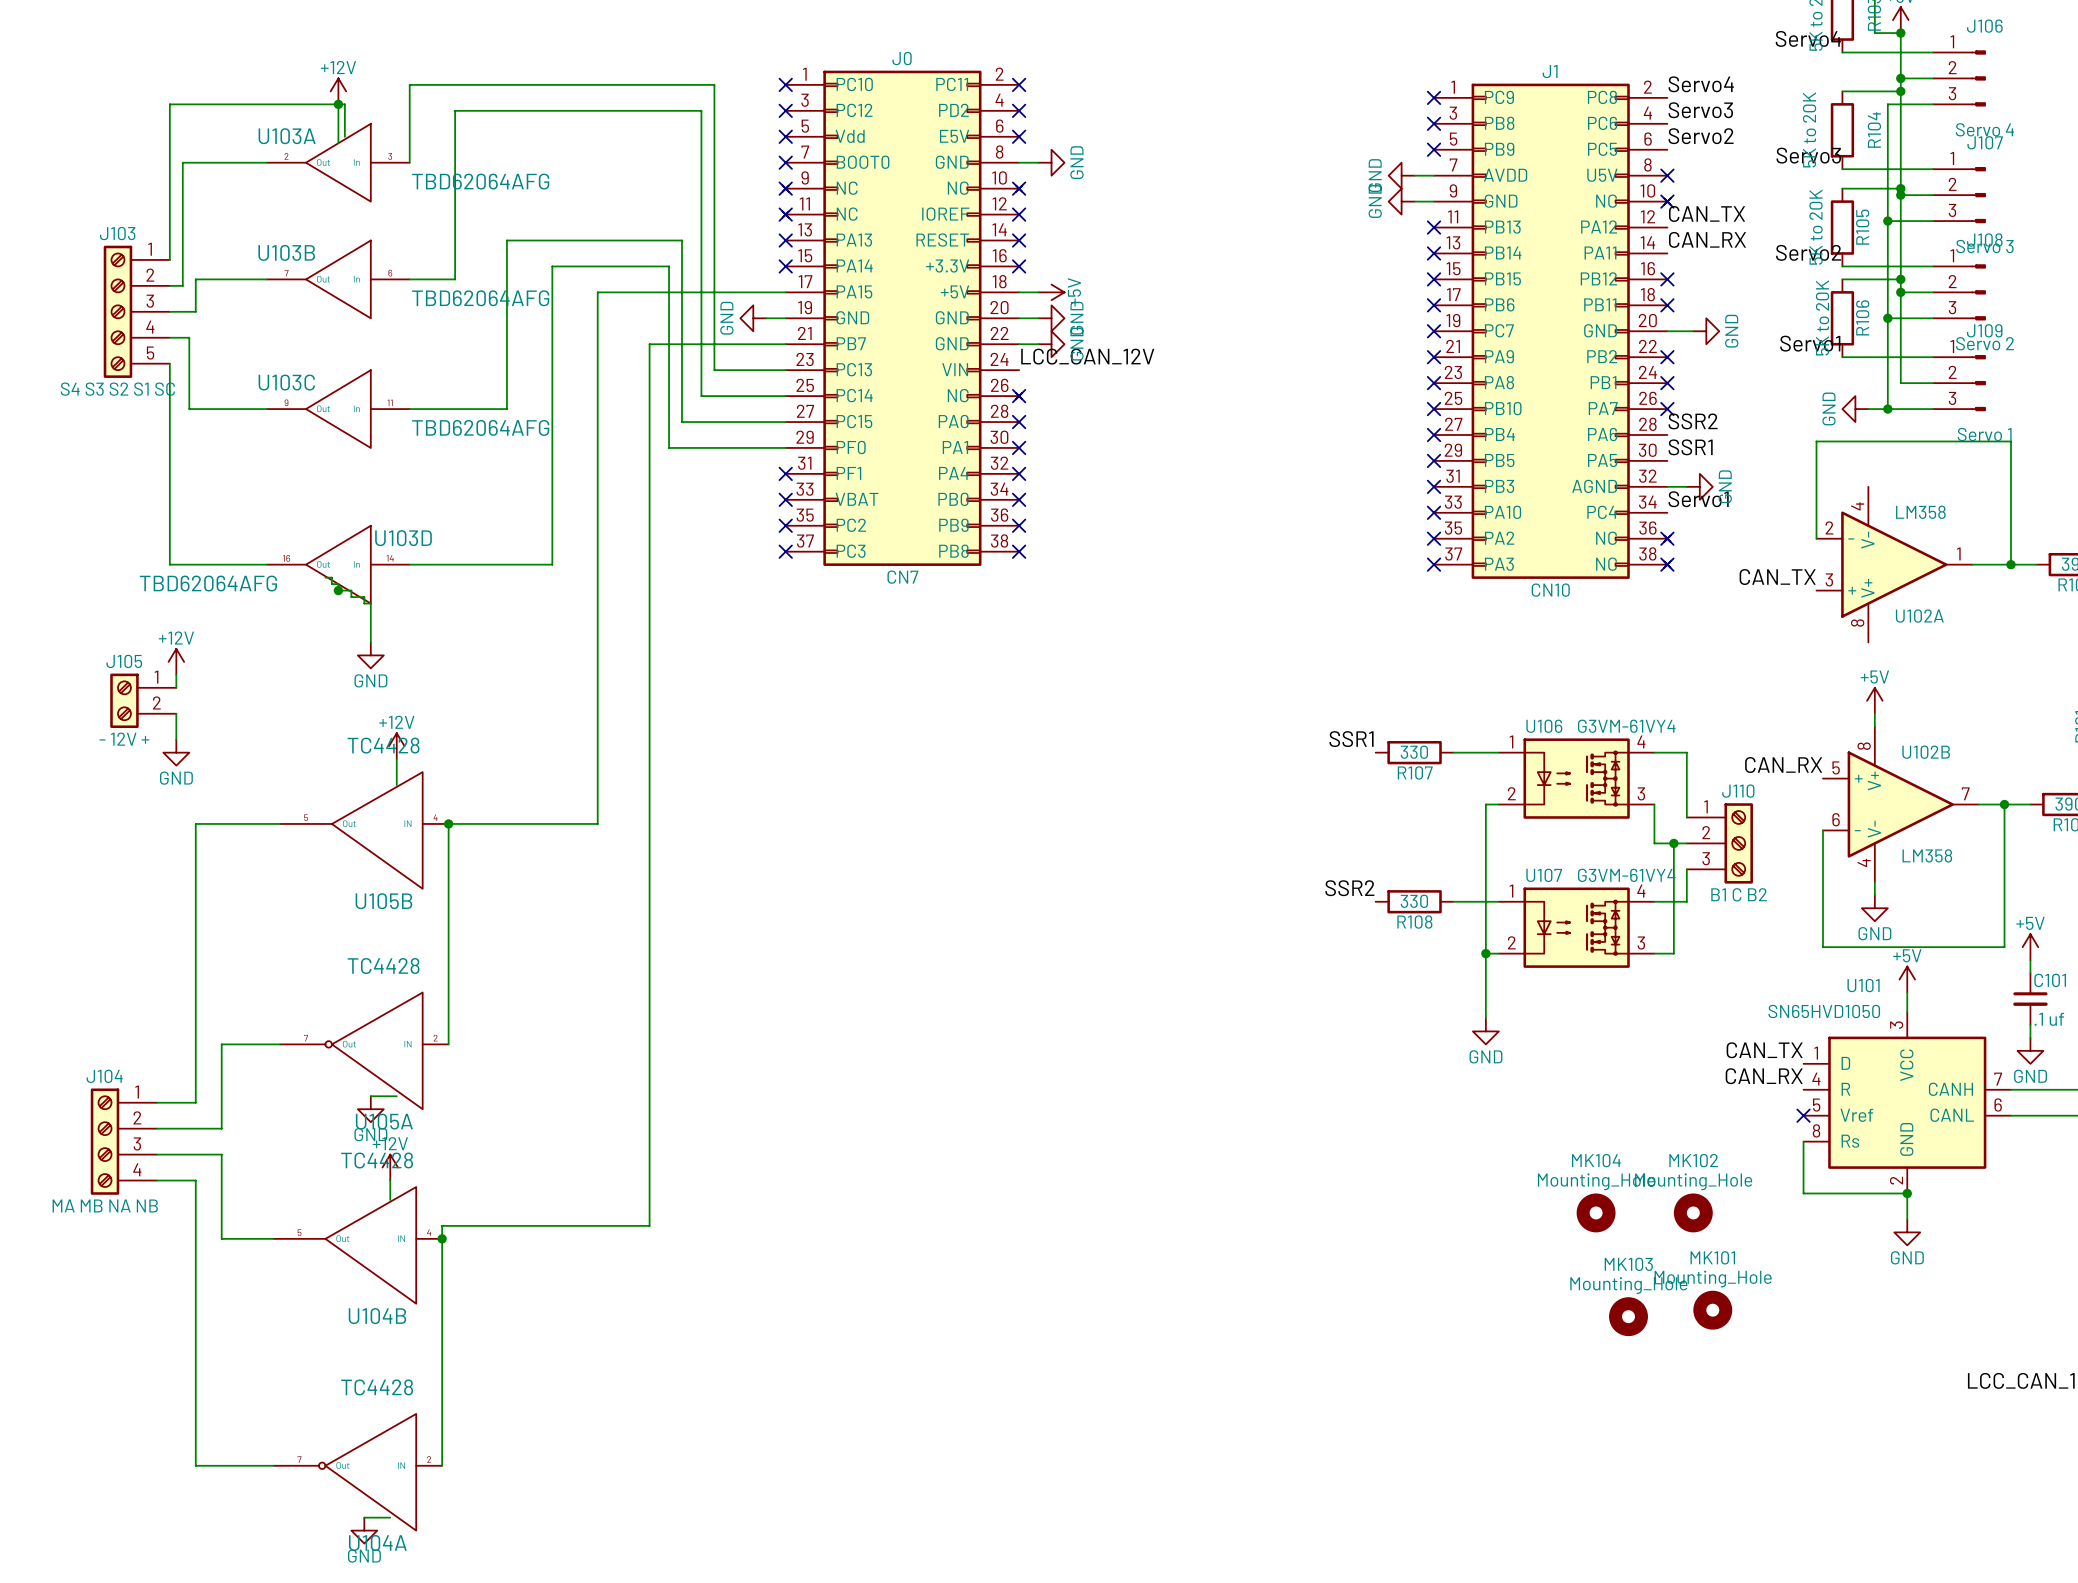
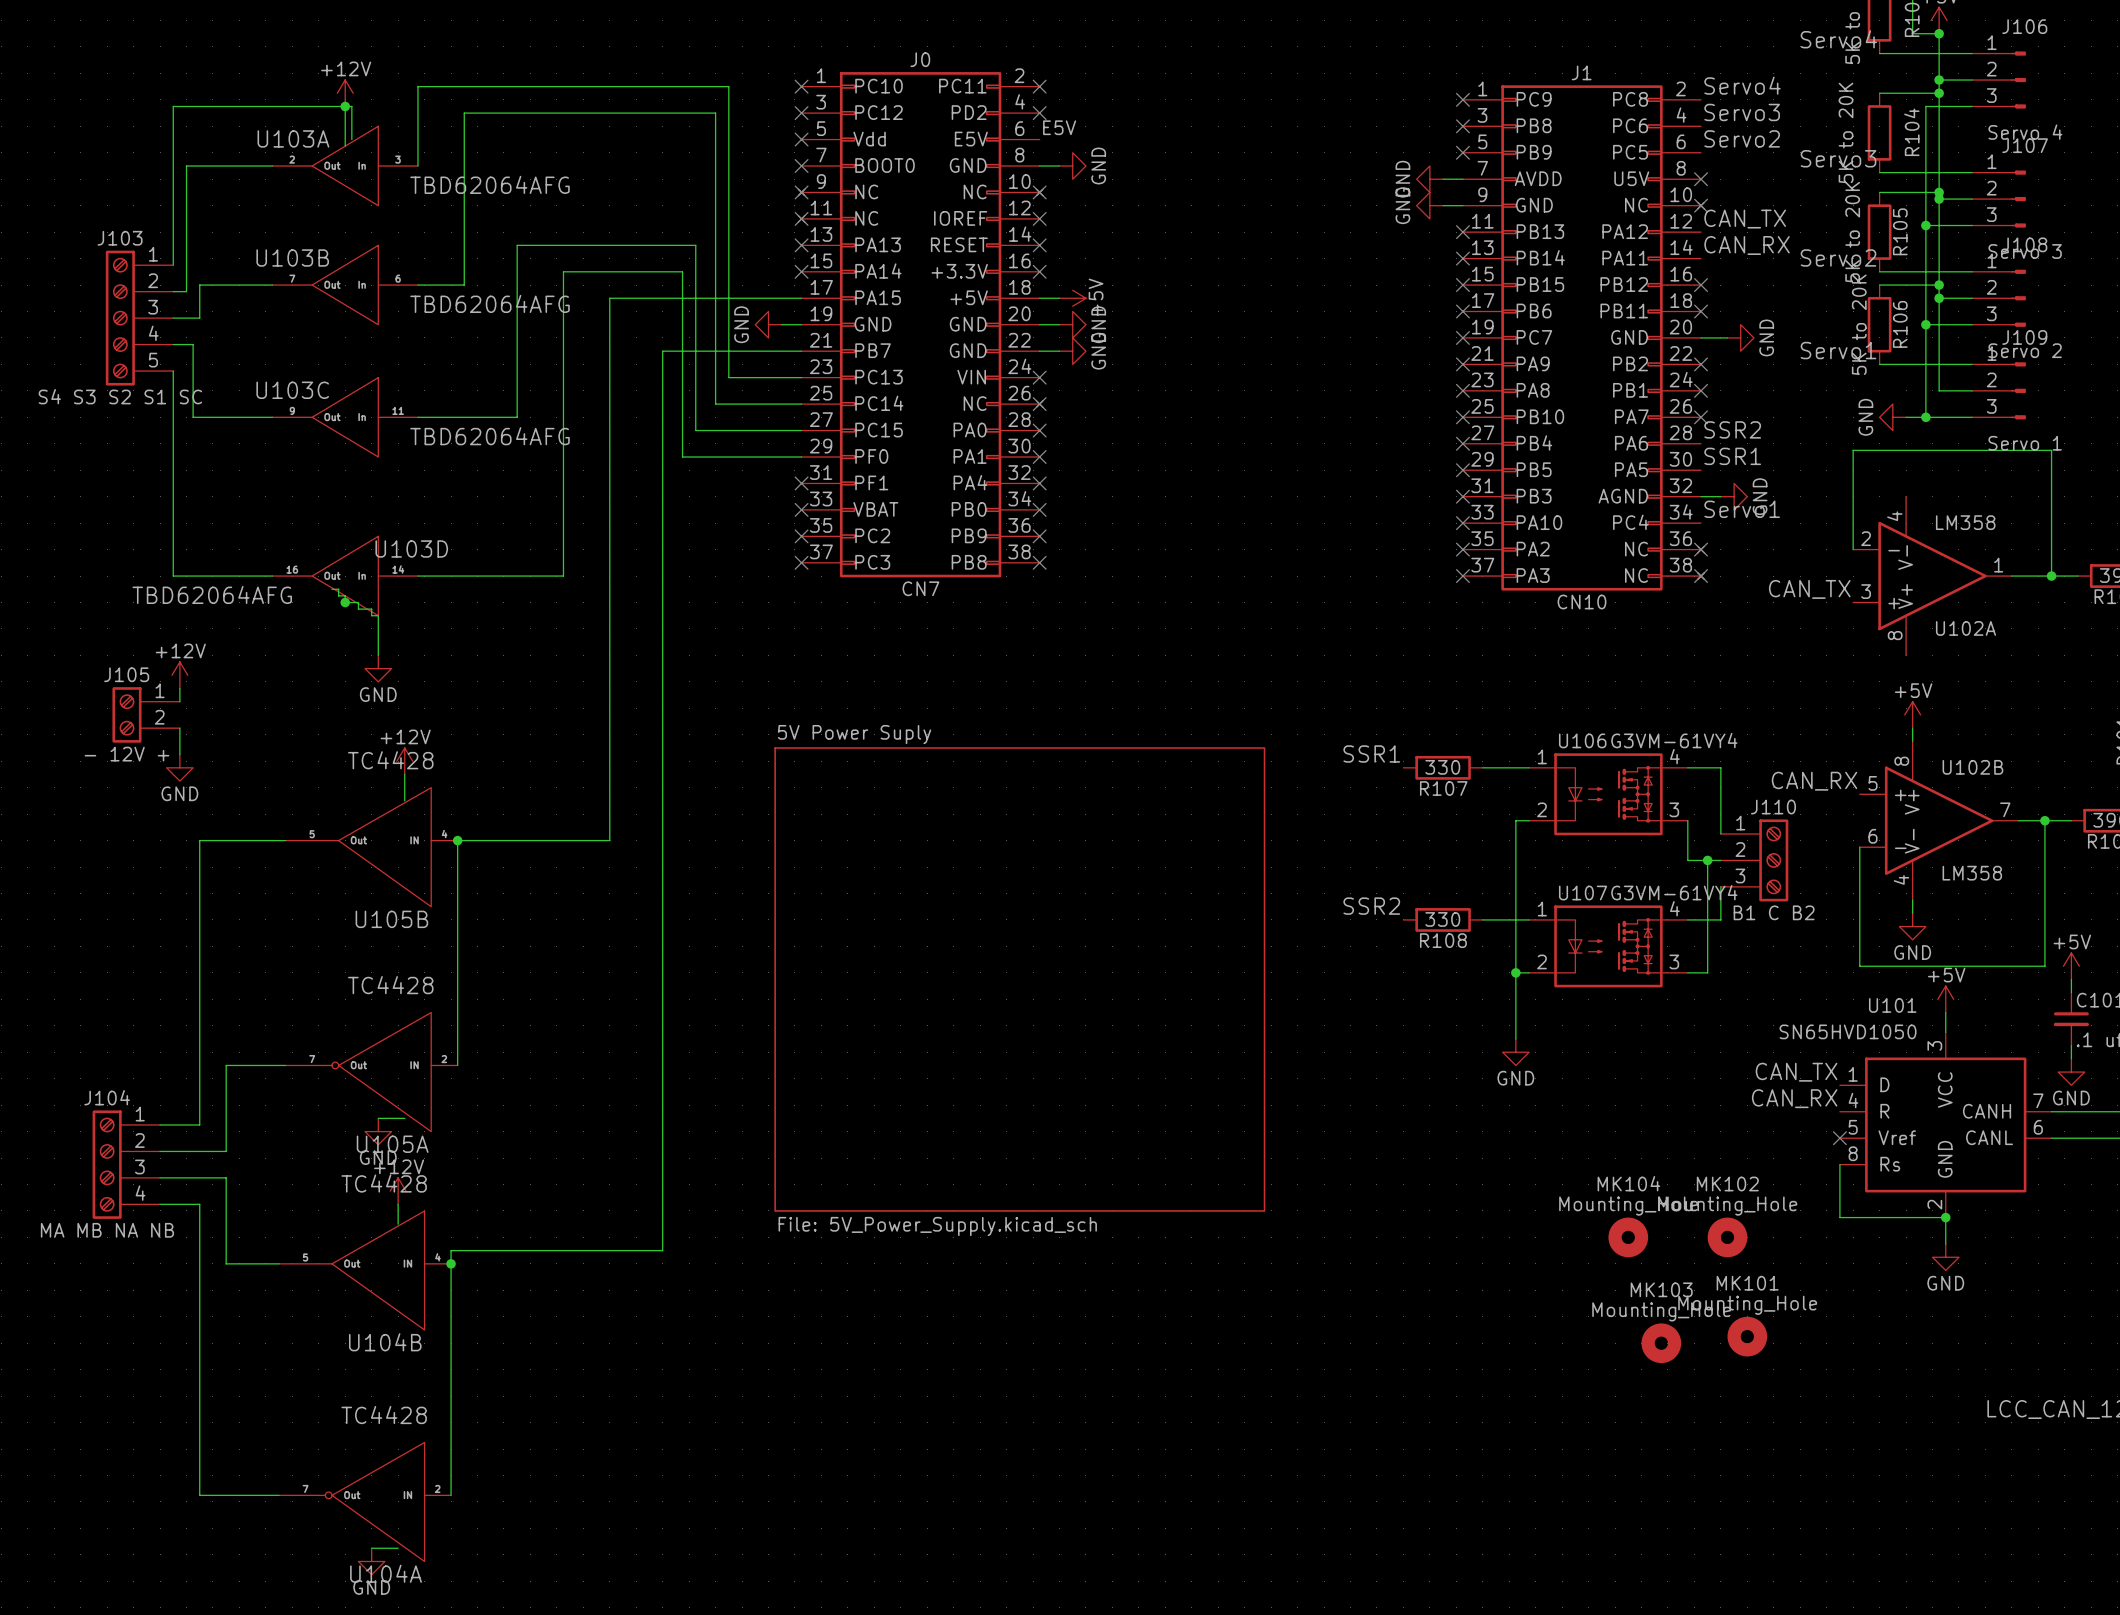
label: none -> E5V (1059, 127)
no-connect mark: (1019, 136) -> none
label: LCC_CAN_12V (1087, 356) -> none
no-connect mark: none -> (1039, 377)
sheet 5V Power Suply: none -> File: 5V_Power_Supply.kicad_sch (1019, 979)

